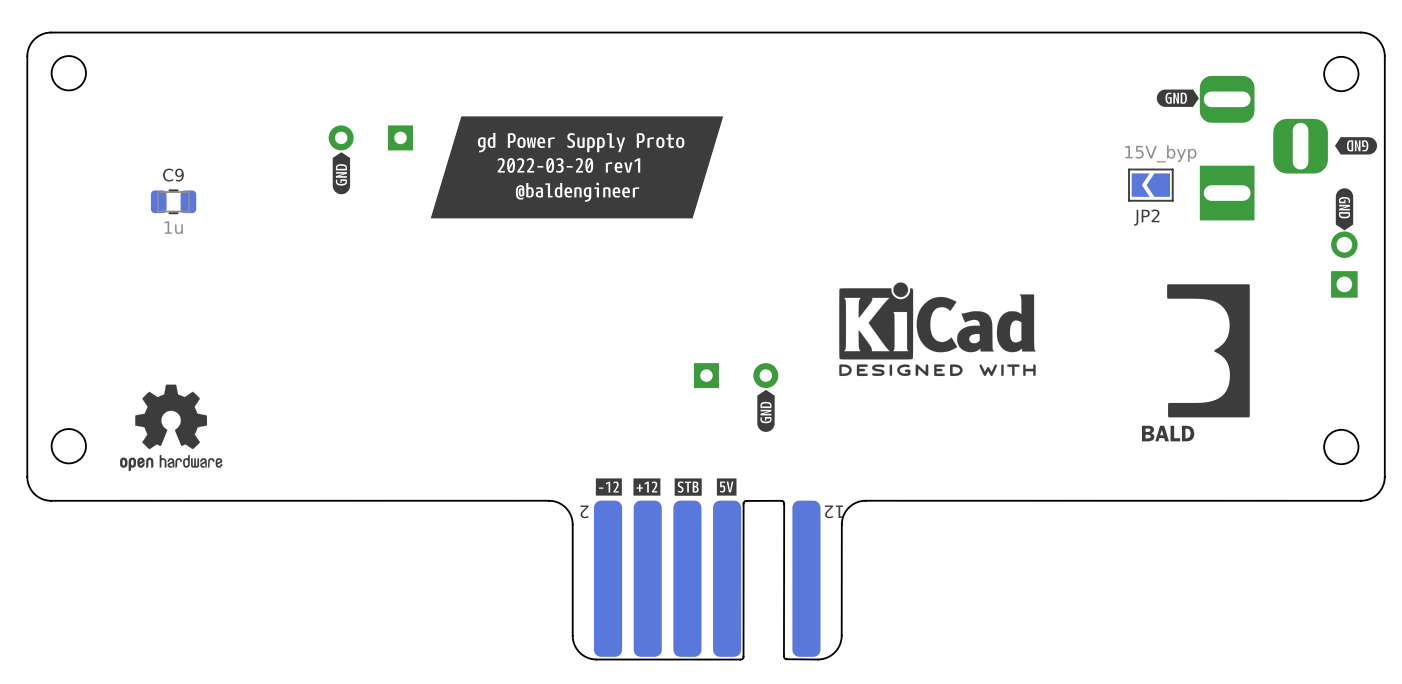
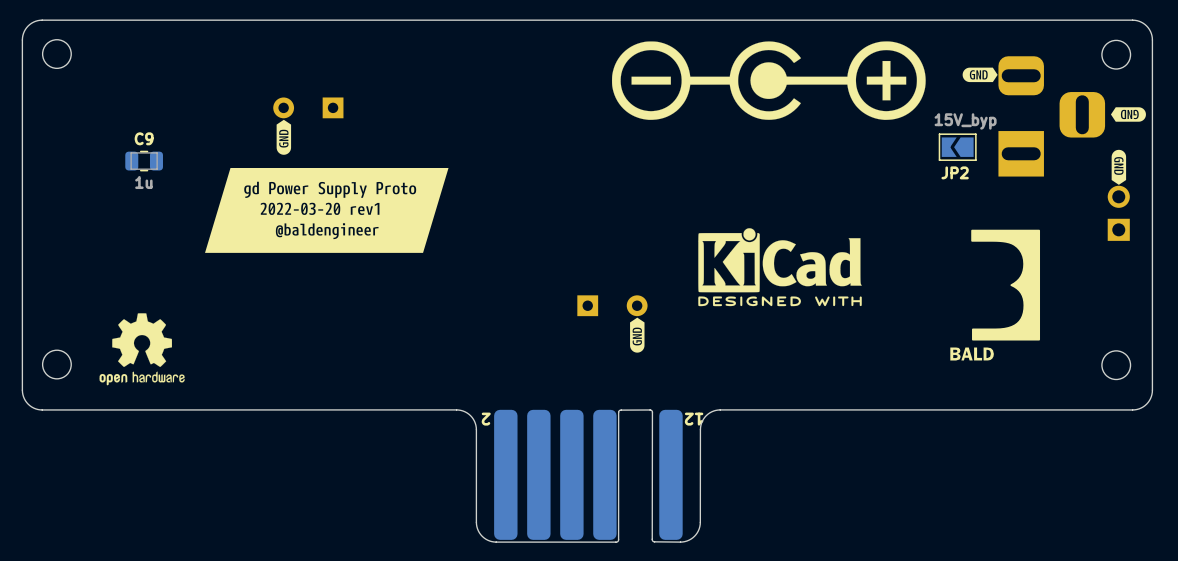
drawing: none -> [611, 41, 926, 120]
drawing position: (576, 167) -> (326, 210)
drawing: [595, 478, 737, 496] -> none

